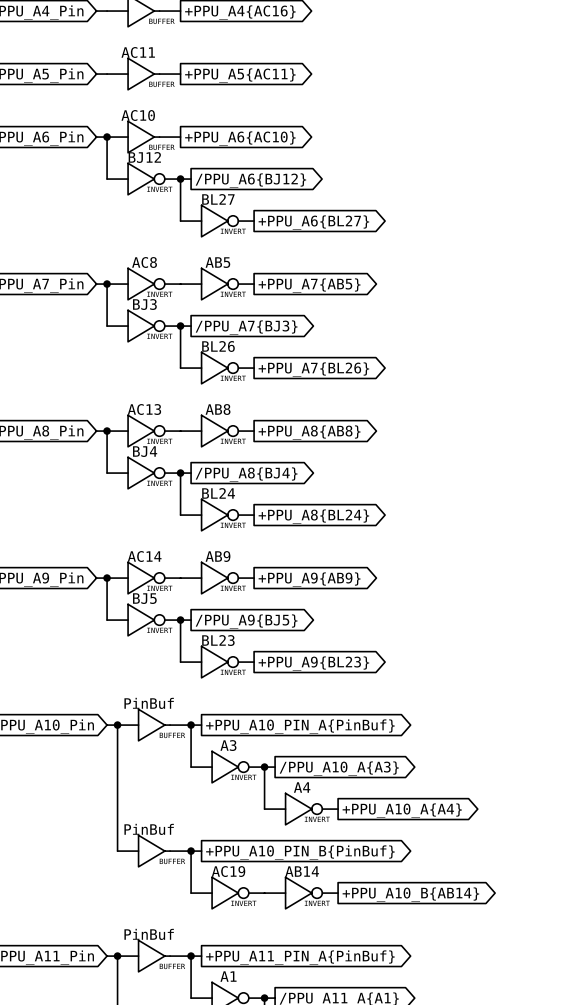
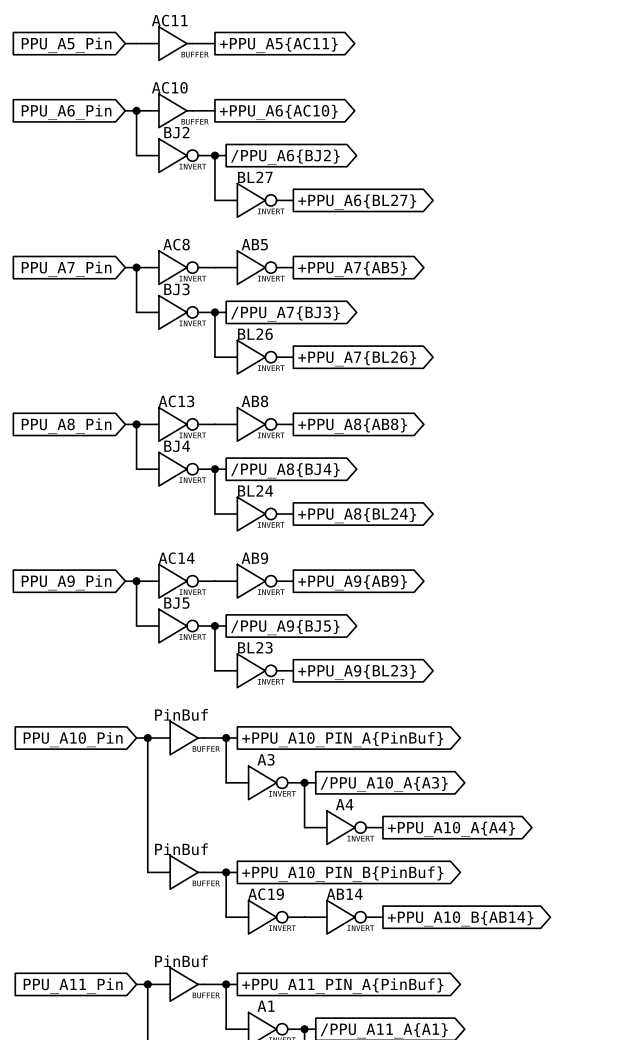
BJ12 name: BJ12 (144, 157) -> BJ2 (176, 132)
global label: /PPU_A6{BJ12} (250, 180) -> /PPU_A6{BJ2} (285, 157)

